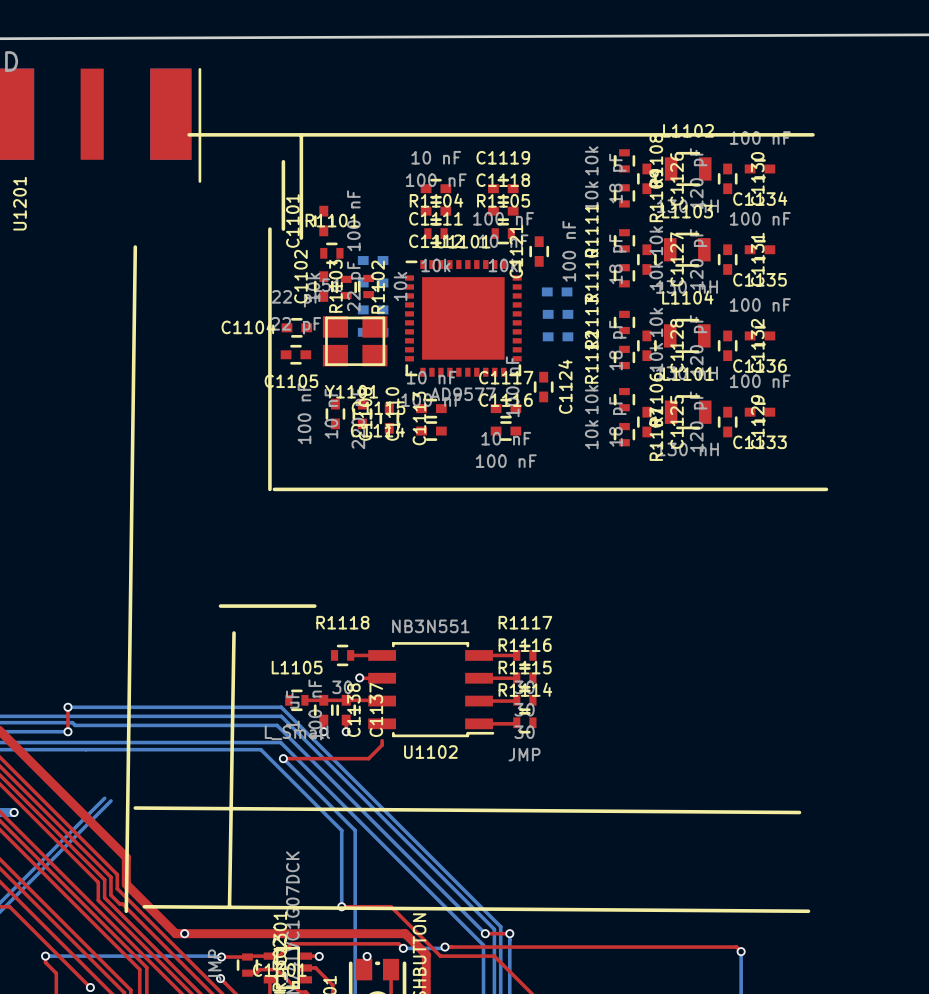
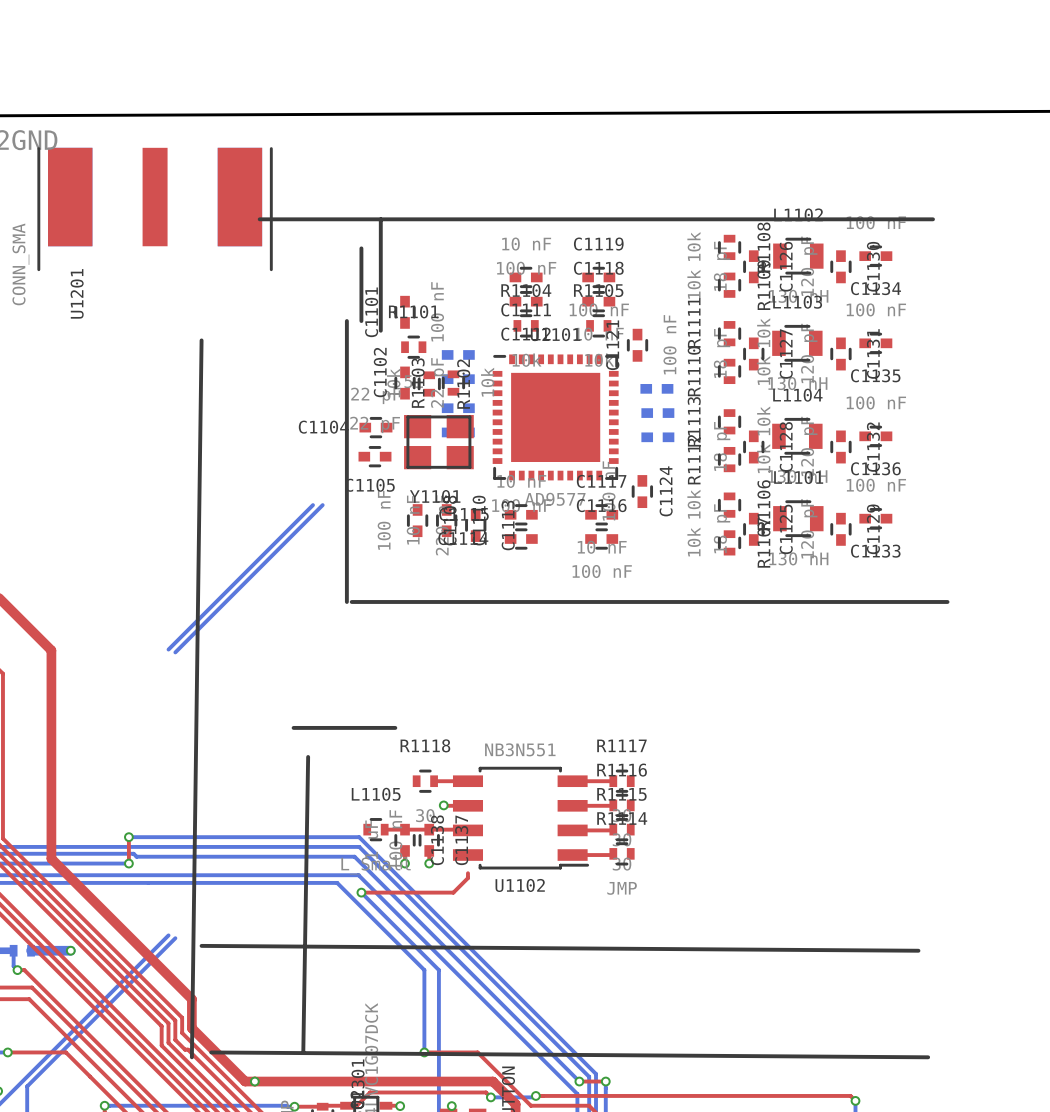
bottom track: none -> (312, 505) (168, 649)
bottom track: none -> (322, 505) (175, 652)

